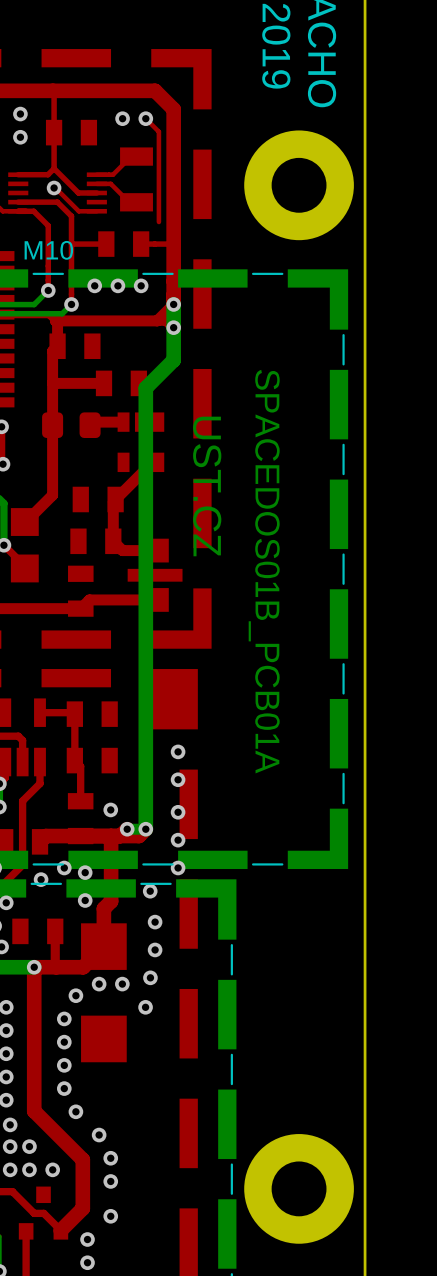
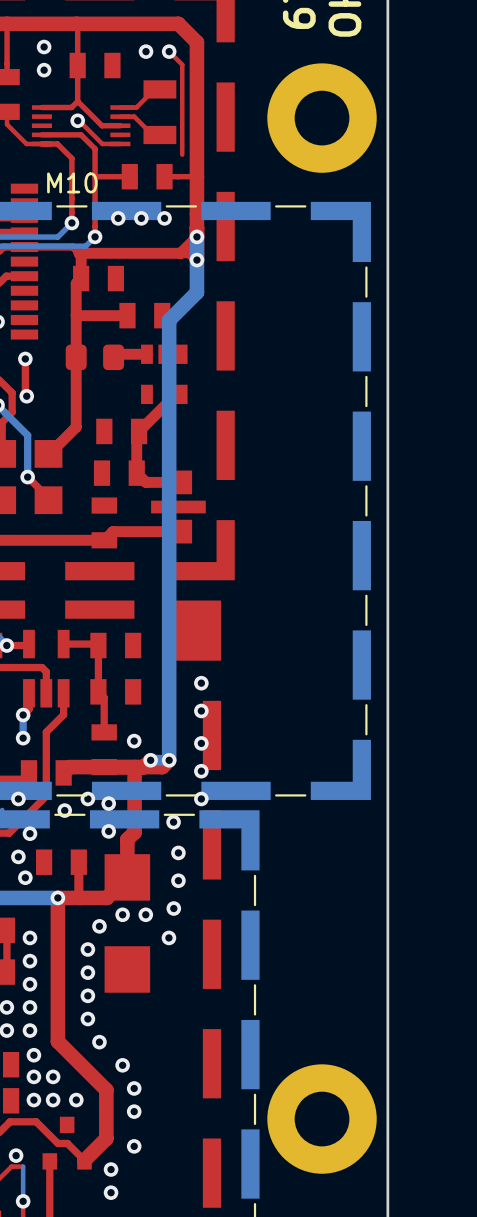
text: UST.CZ (207, 486) -> none
text: SPACEDOS01B_PCB01A (264, 571) -> none

